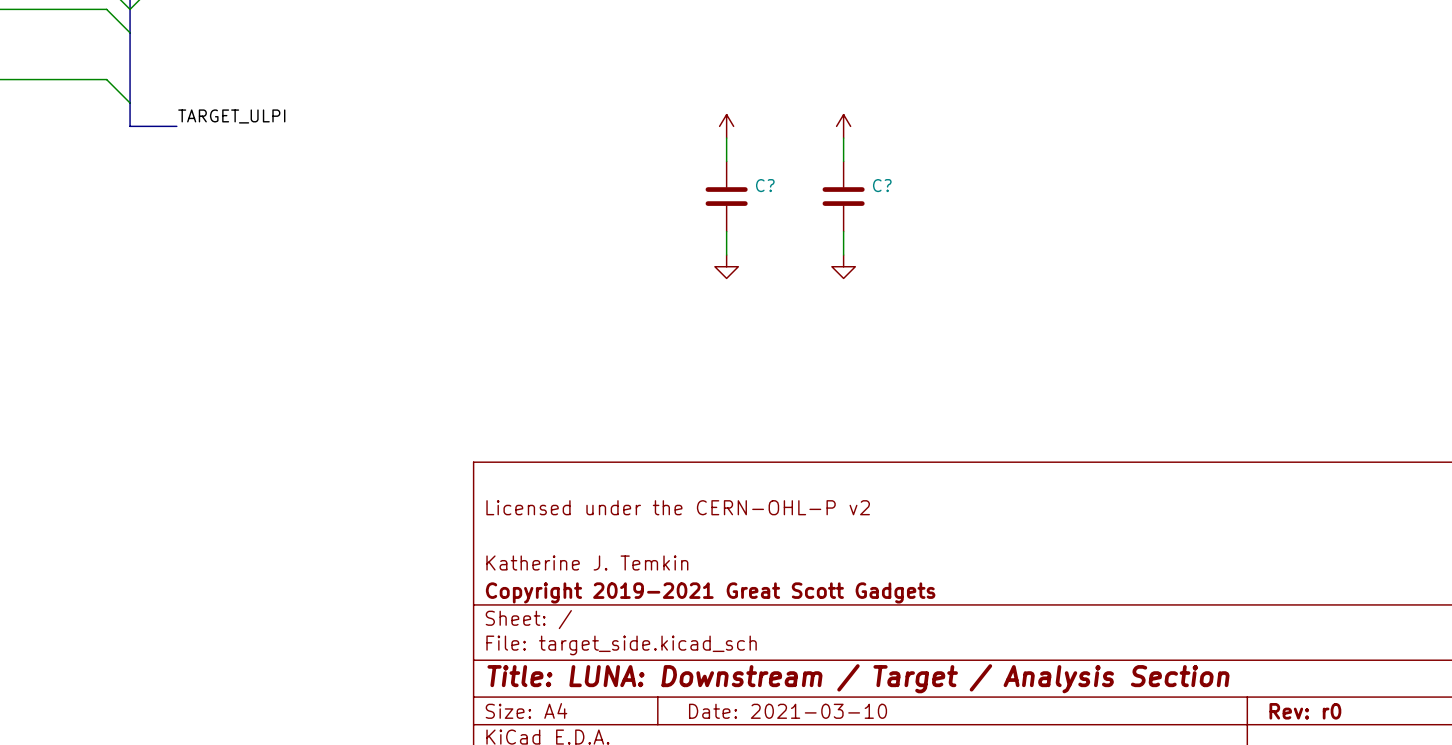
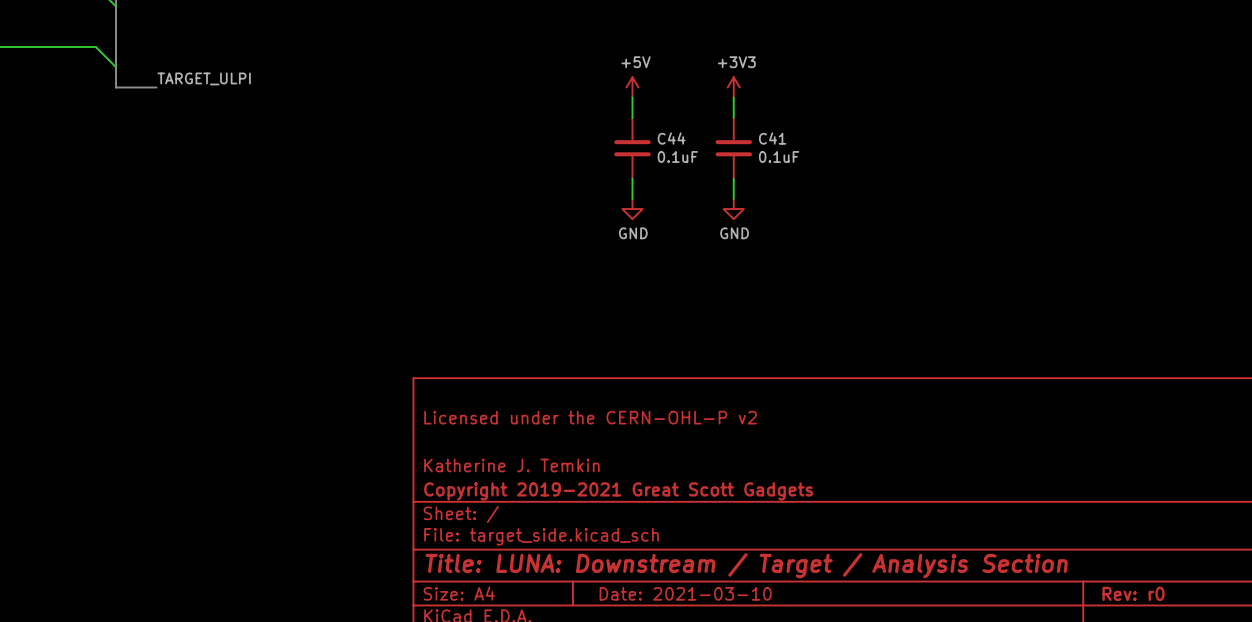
power symbol text: none -> +5V (636, 62)
power symbol text: none -> +3V3 (736, 62)
C? name: C? (765, 185) -> C44 (671, 138)
C? name: C? (882, 185) -> C41 (772, 138)
C? value: none -> 0.1uF (677, 156)
C? value: none -> 0.1uF (779, 156)
power symbol text: none -> GND (633, 233)
power symbol text: none -> GND (734, 233)

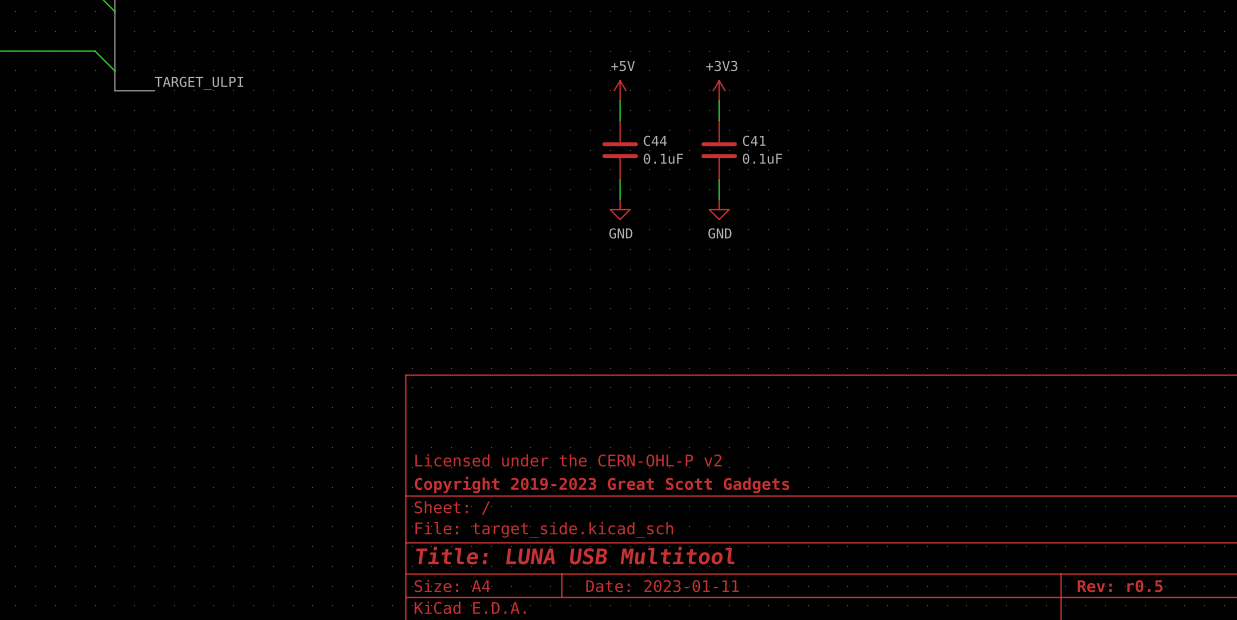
title block: Licensed under the CERN-OHL-P v2 (590, 417) -> none
title block: Katherine J. Temkin (511, 465) -> Licensed under the CERN-OHL-P v2 (568, 460)
title block: Copyright 2019-2021 Great Scott Gadgets (618, 491) -> Copyright 2019-2023 Great Scott Gadgets (601, 484)
title block: Title: LUNA: Downstream / Target / Analysis Section (746, 565) -> Title: LUNA USB Multitool (575, 555)
title block: Date: 2021-03-10 (685, 593) -> Date: 2023-01-11 (662, 586)
title block: Rev: r0 (1133, 593) -> Rev: r0.5 (1120, 586)

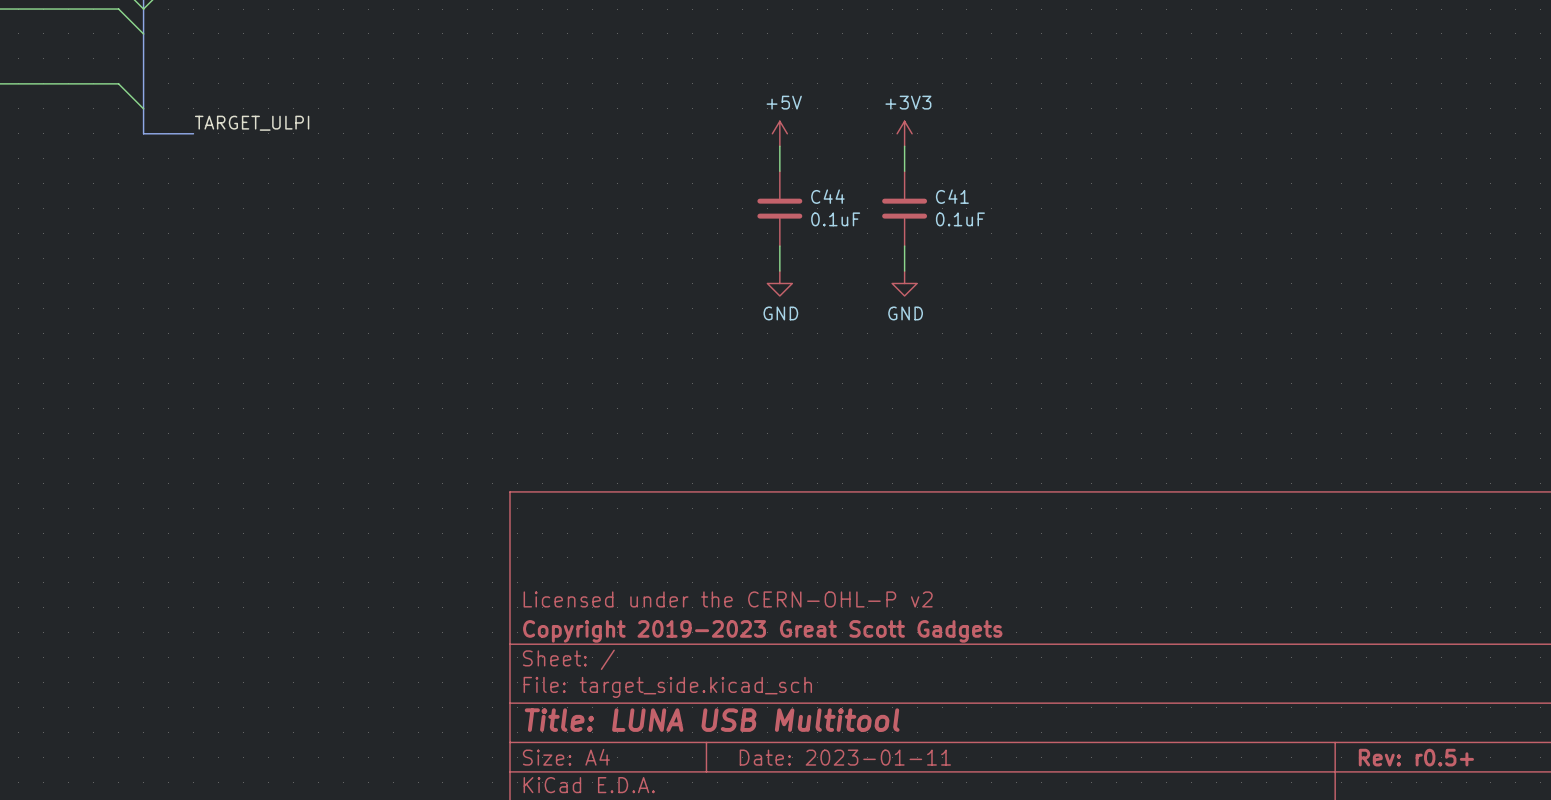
title block: Rev: r0.5 (1120, 586) -> Rev: r0.5+ (1416, 757)

